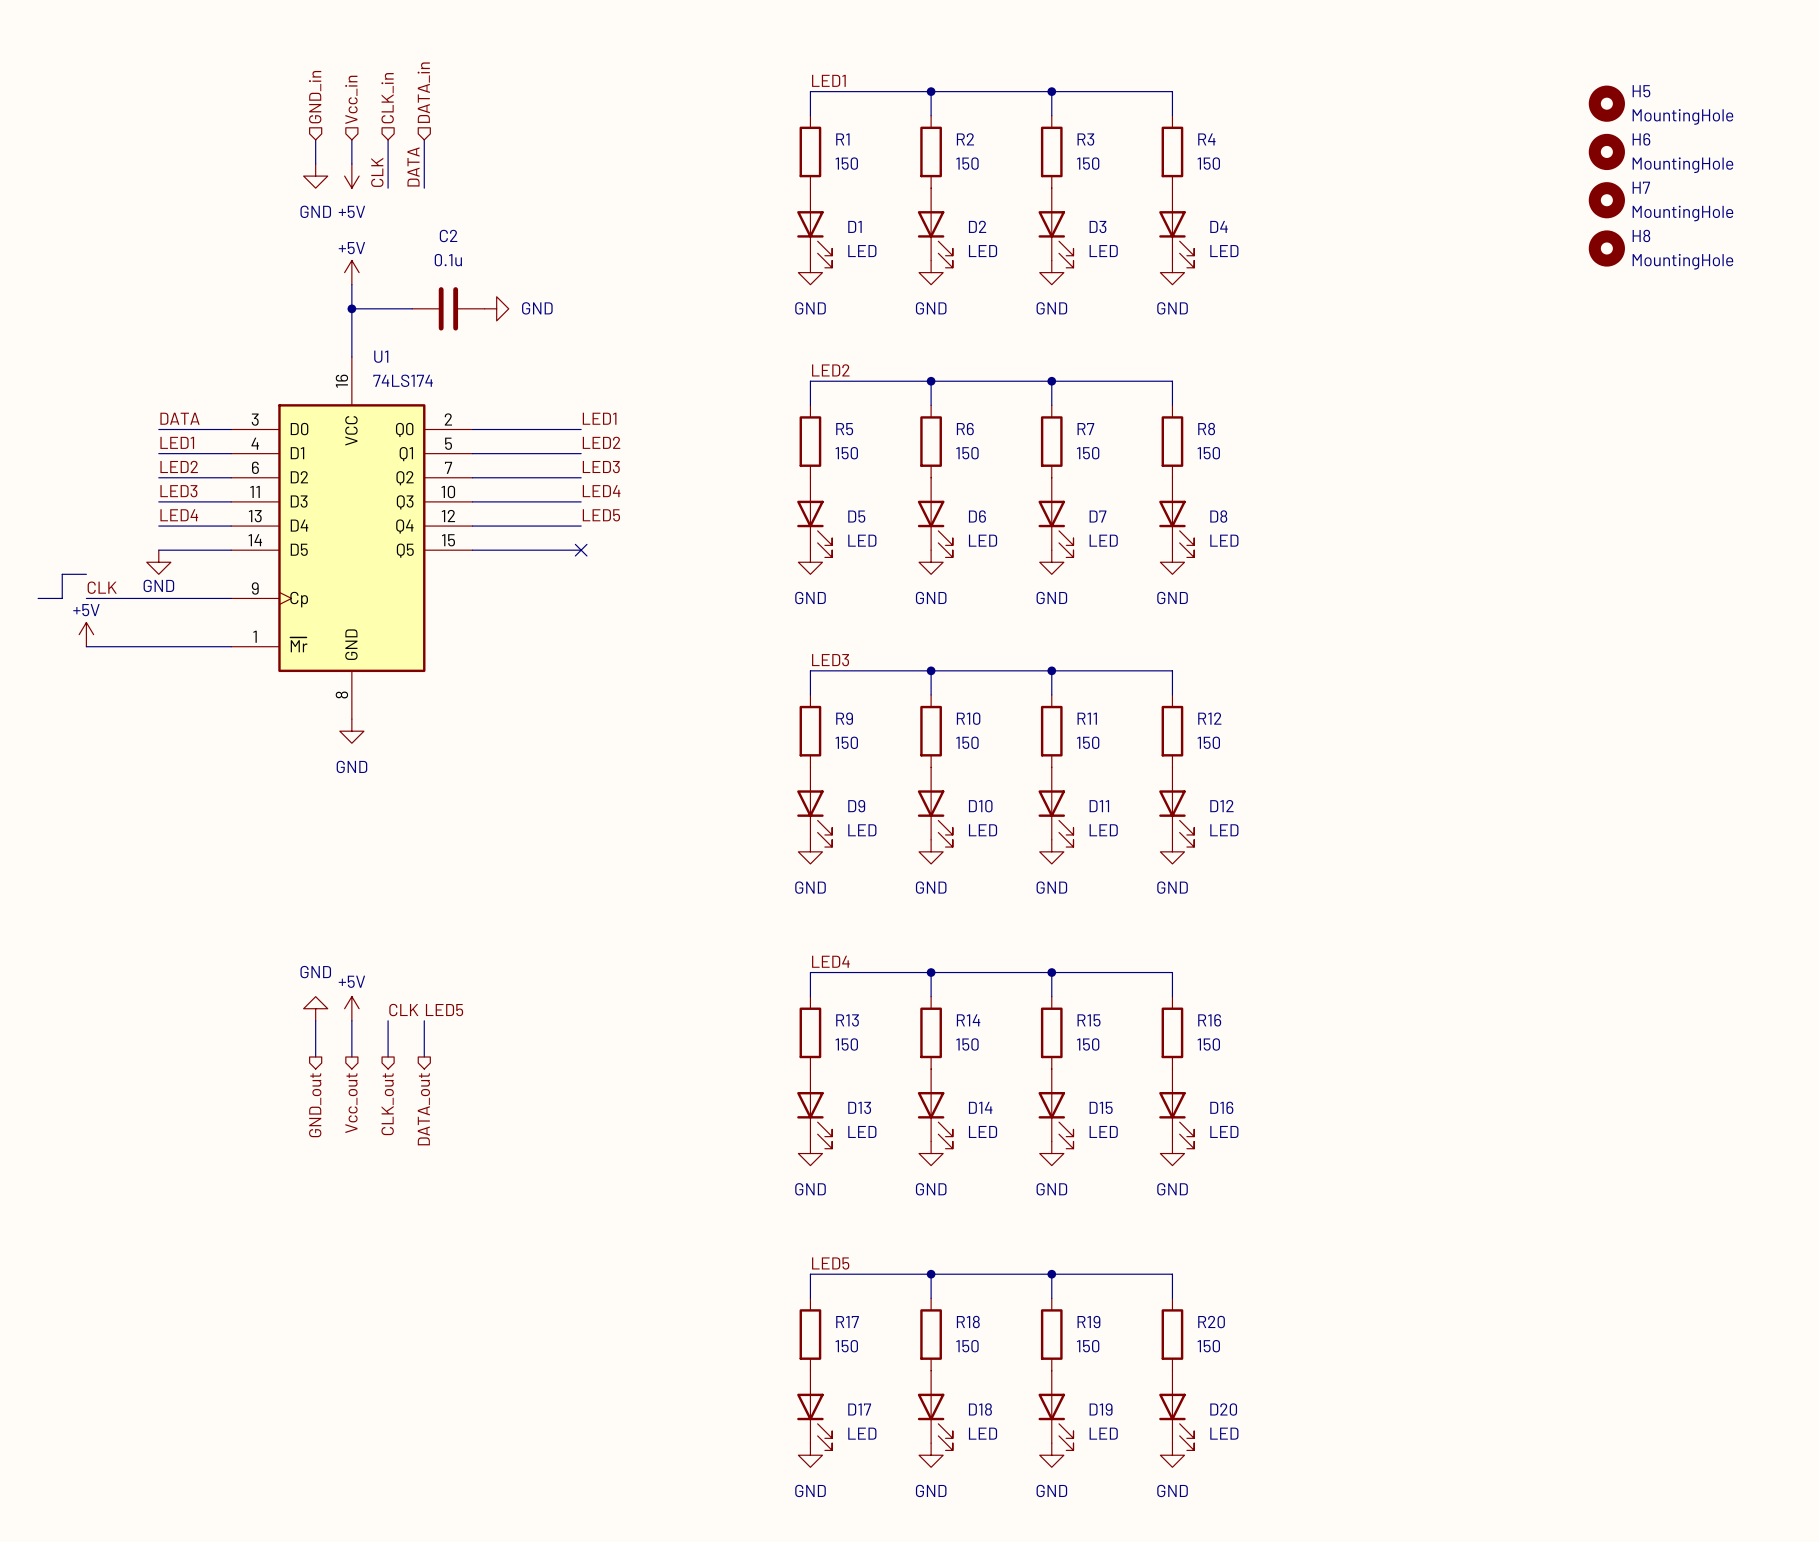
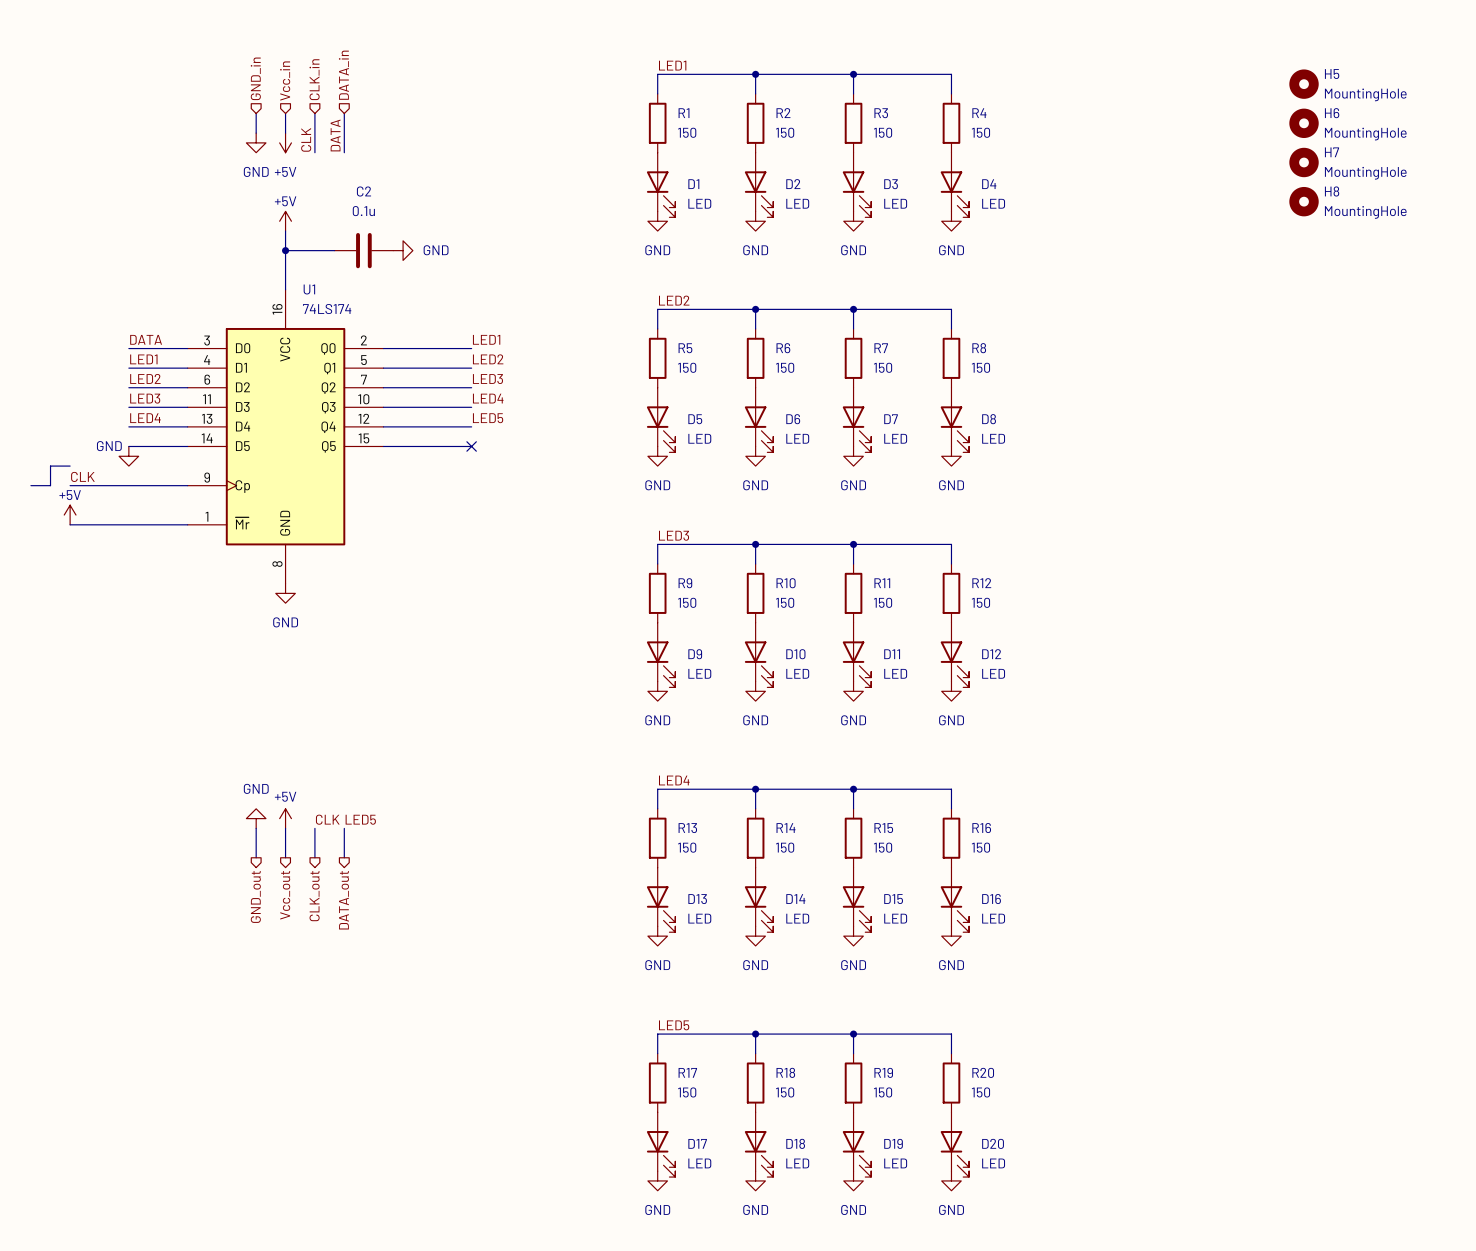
power symbol text position: GND (158, 585) -> GND (109, 446)

